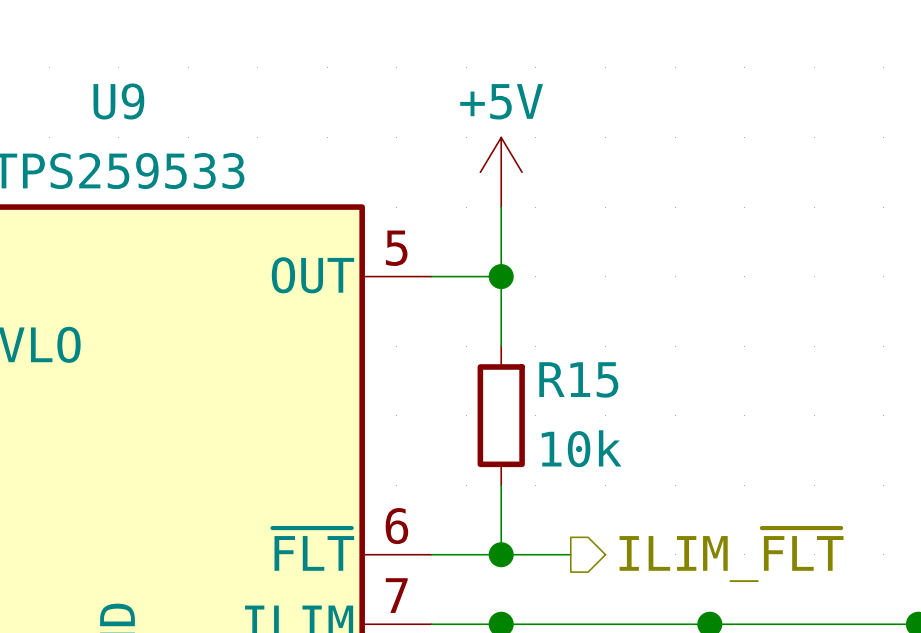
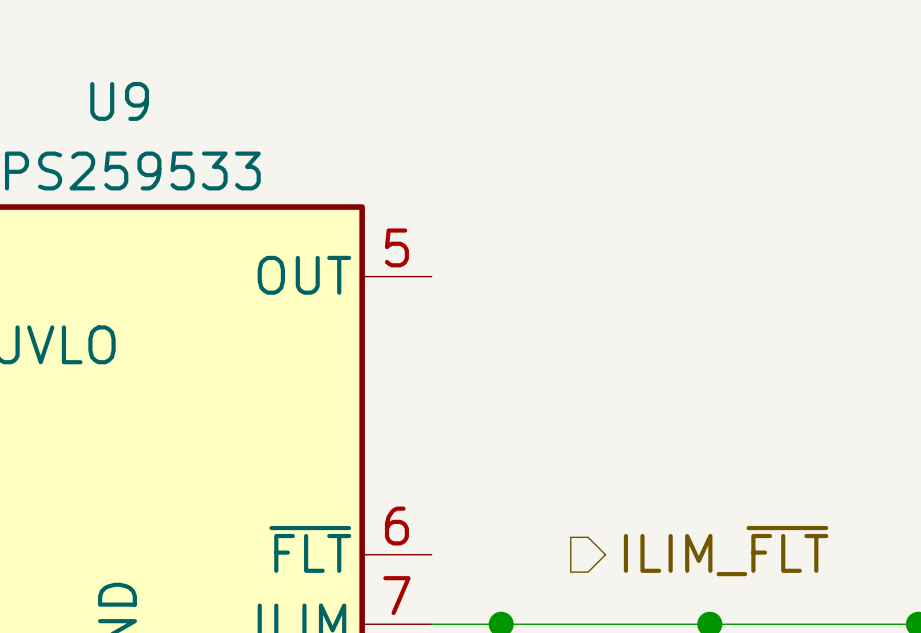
power symbol: +5V (501, 172) -> none
wire: (501, 207) (501, 346) -> none
wire: (431, 276) (501, 276) -> none
junction: (501, 276) -> none
R15: 10k (501, 415) -> none
wire: (501, 485) (501, 554) -> none
wire: (431, 554) (570, 554) -> none
junction: (501, 554) -> none

